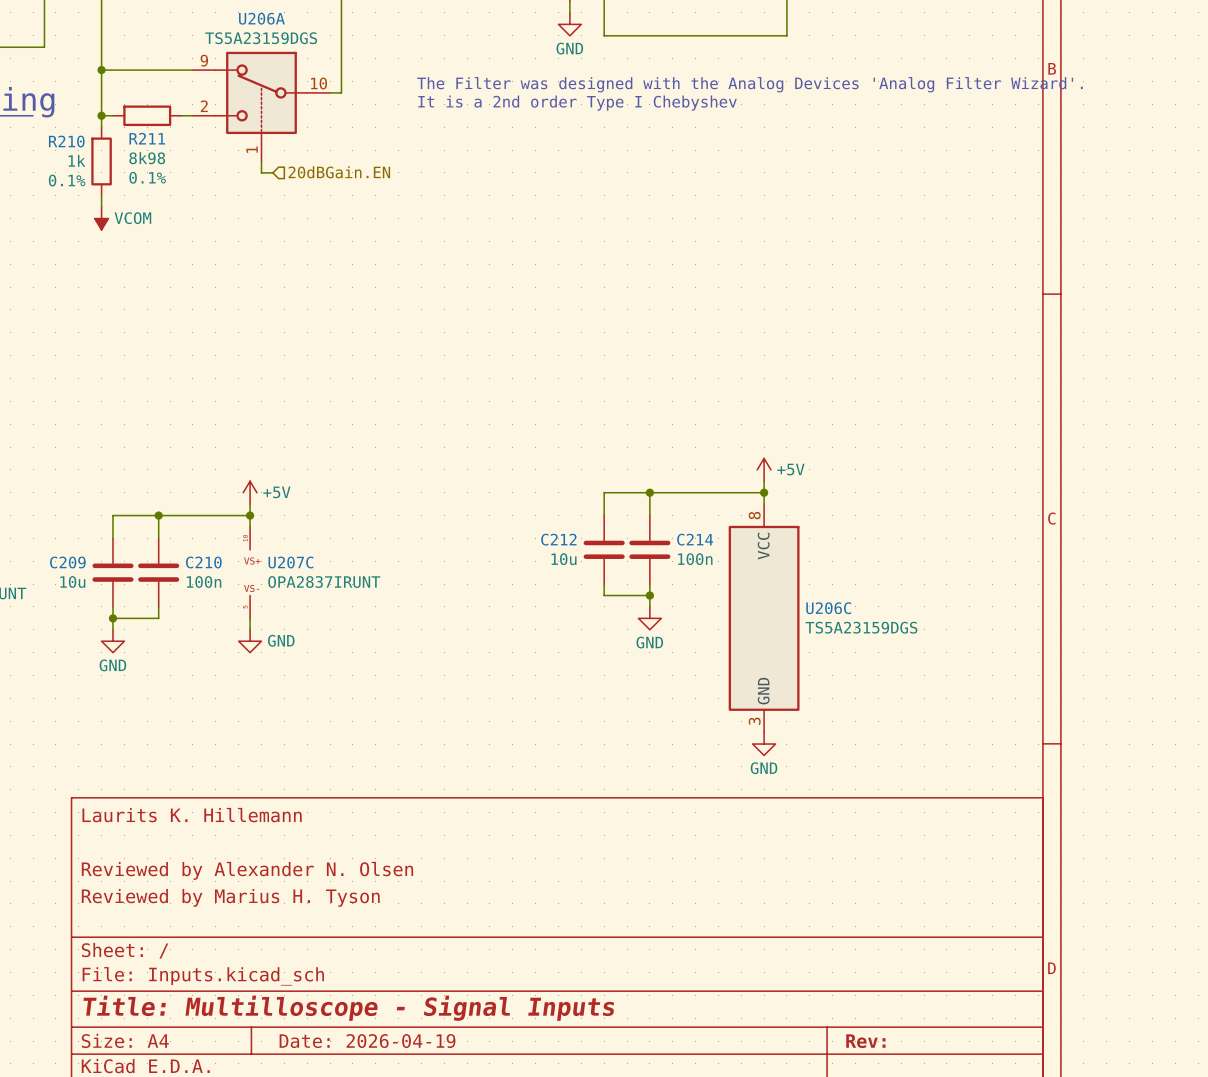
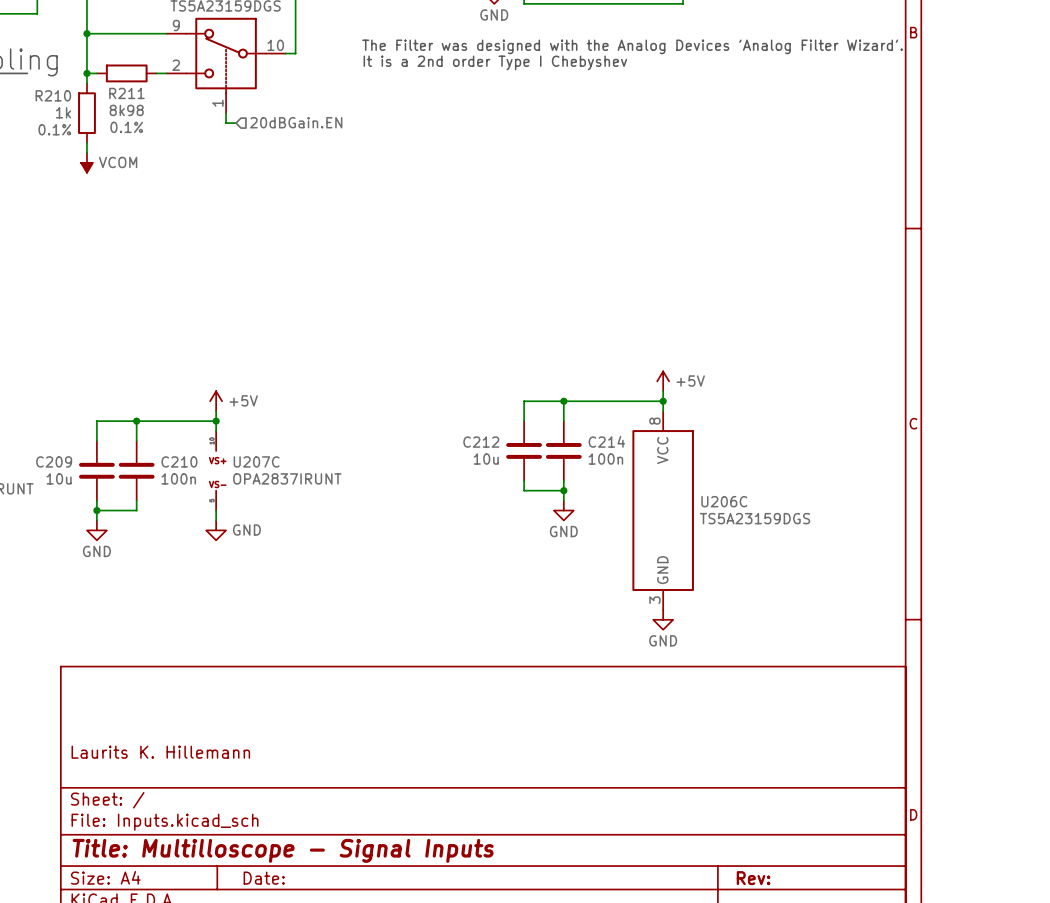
title block: Laurits K. Hillemann (192, 815) -> none
title block: Reviewed by Alexander N. Olsen (247, 870) -> none
title block: Reviewed by Marius H. Tyson (230, 897) -> Laurits K. Hillemann (160, 752)
title block: Date: 2026-04-19 (367, 1041) -> Date: (264, 878)

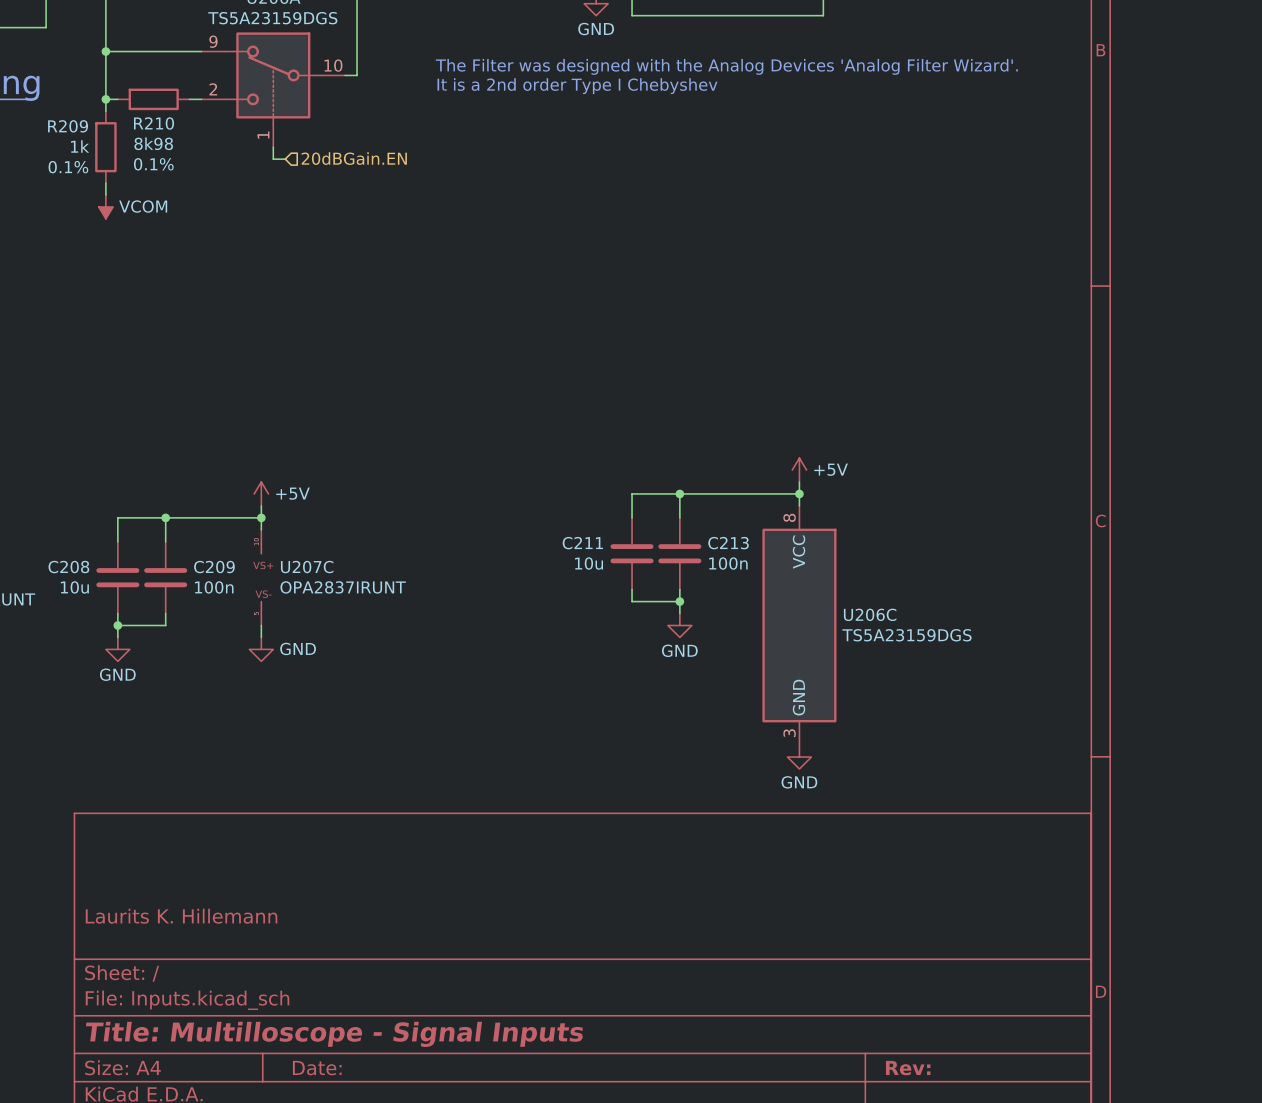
R211 name: R211 (126, 93) -> R210 (153, 123)
R210 name: R210 (53, 95) -> R209 (68, 126)
C214 name: C214 (606, 441) -> C213 (728, 543)
C212 name: C212 (481, 442) -> C211 (582, 543)
C209 name: C209 (54, 461) -> C208 (68, 567)
C210 name: C210 (179, 461) -> C209 (214, 567)

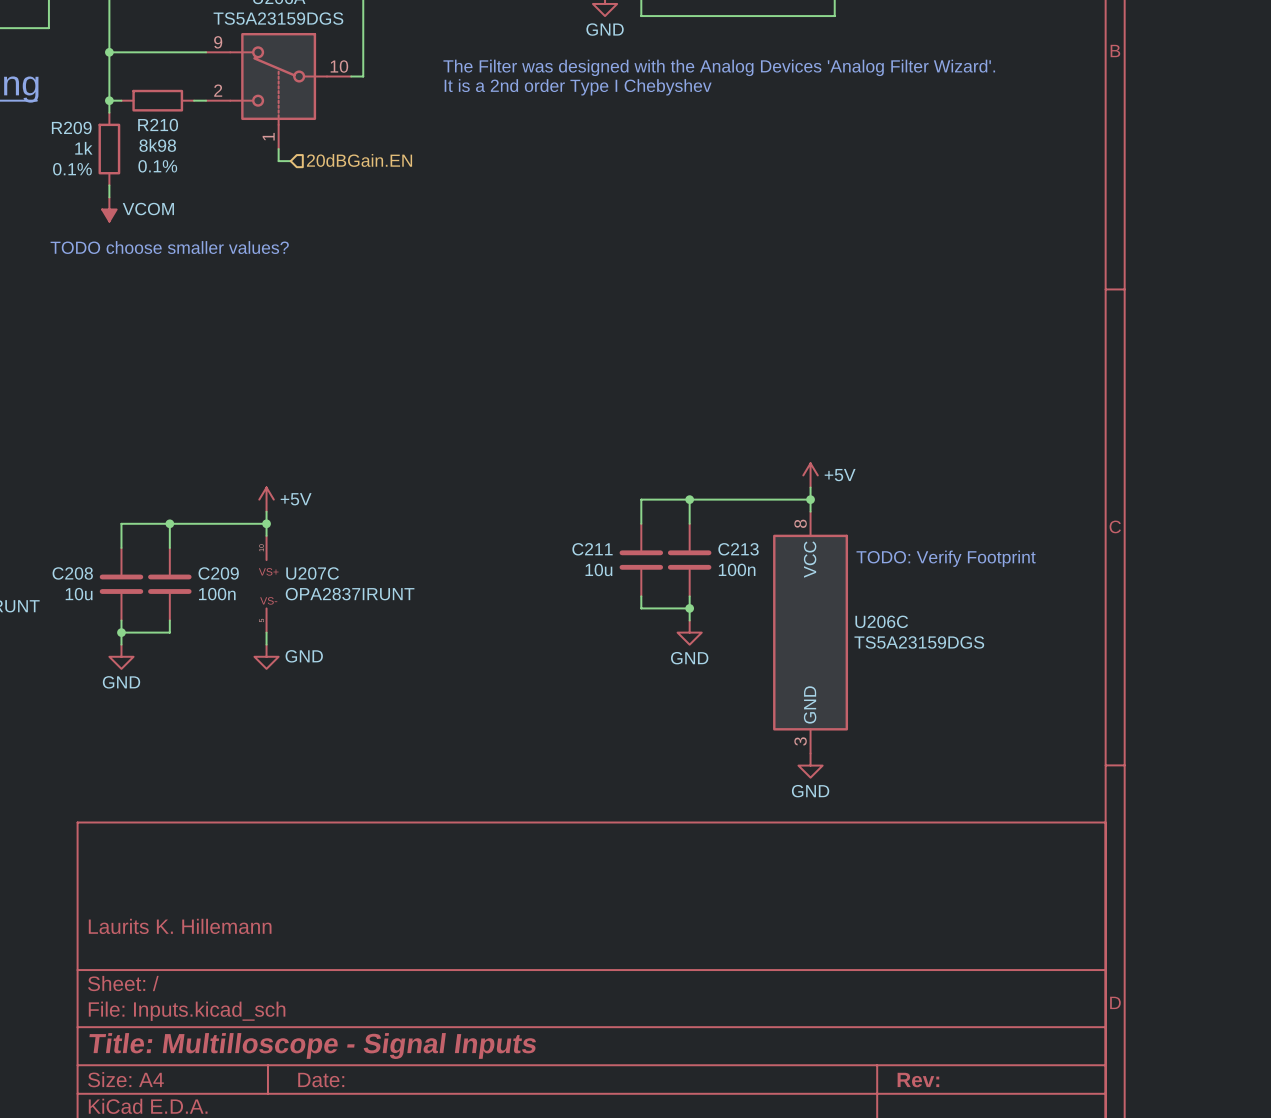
text: none -> TODO choose smaller values? (169, 247)
text: none -> TODO: Verify Footprint (946, 558)

